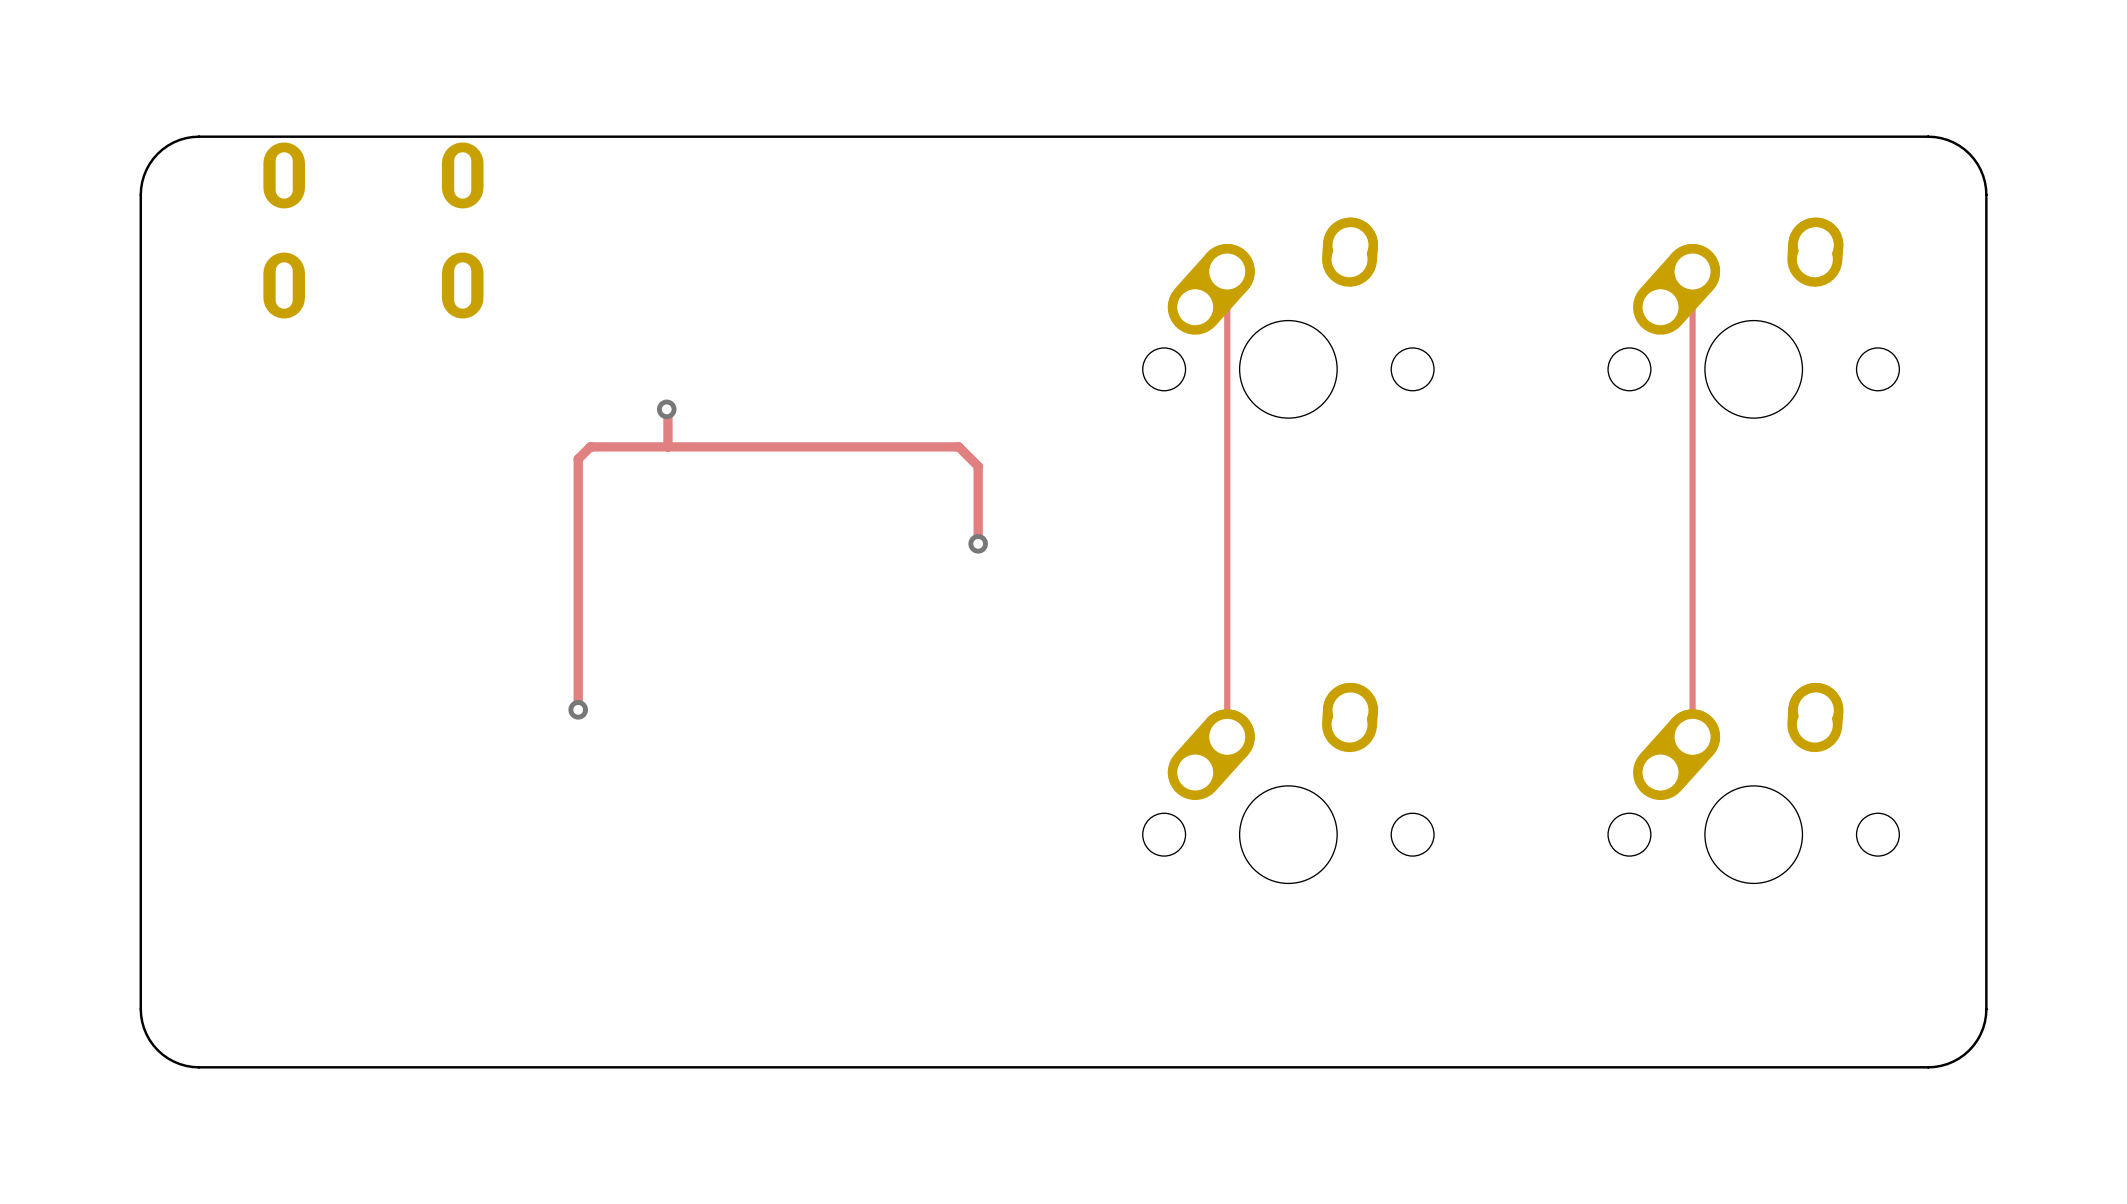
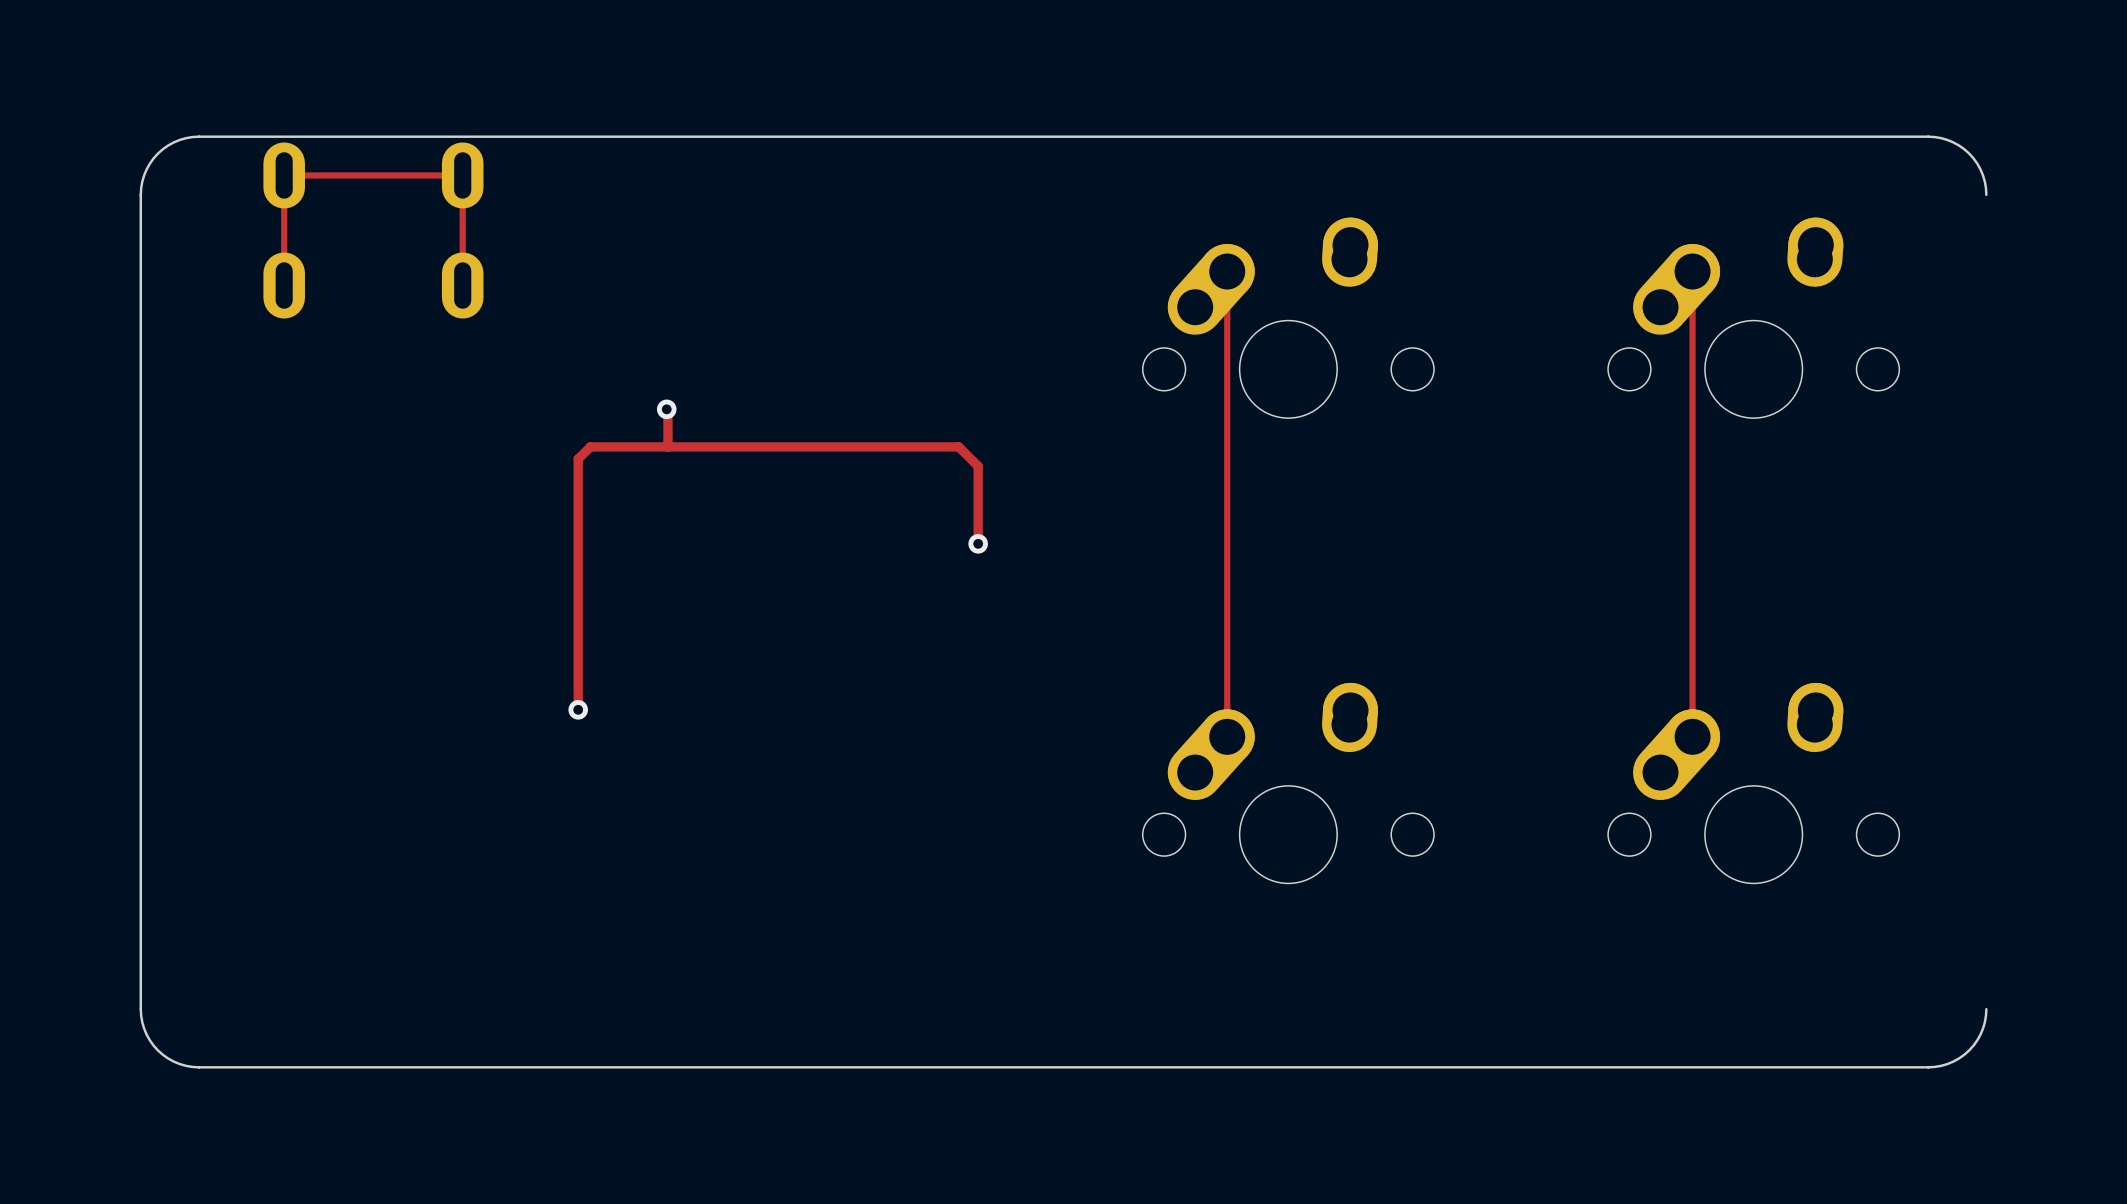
board edge: (1986, 194) (1986, 1009) -> none
track: none -> (284, 285) (284, 175) (462, 175) (462, 285)

